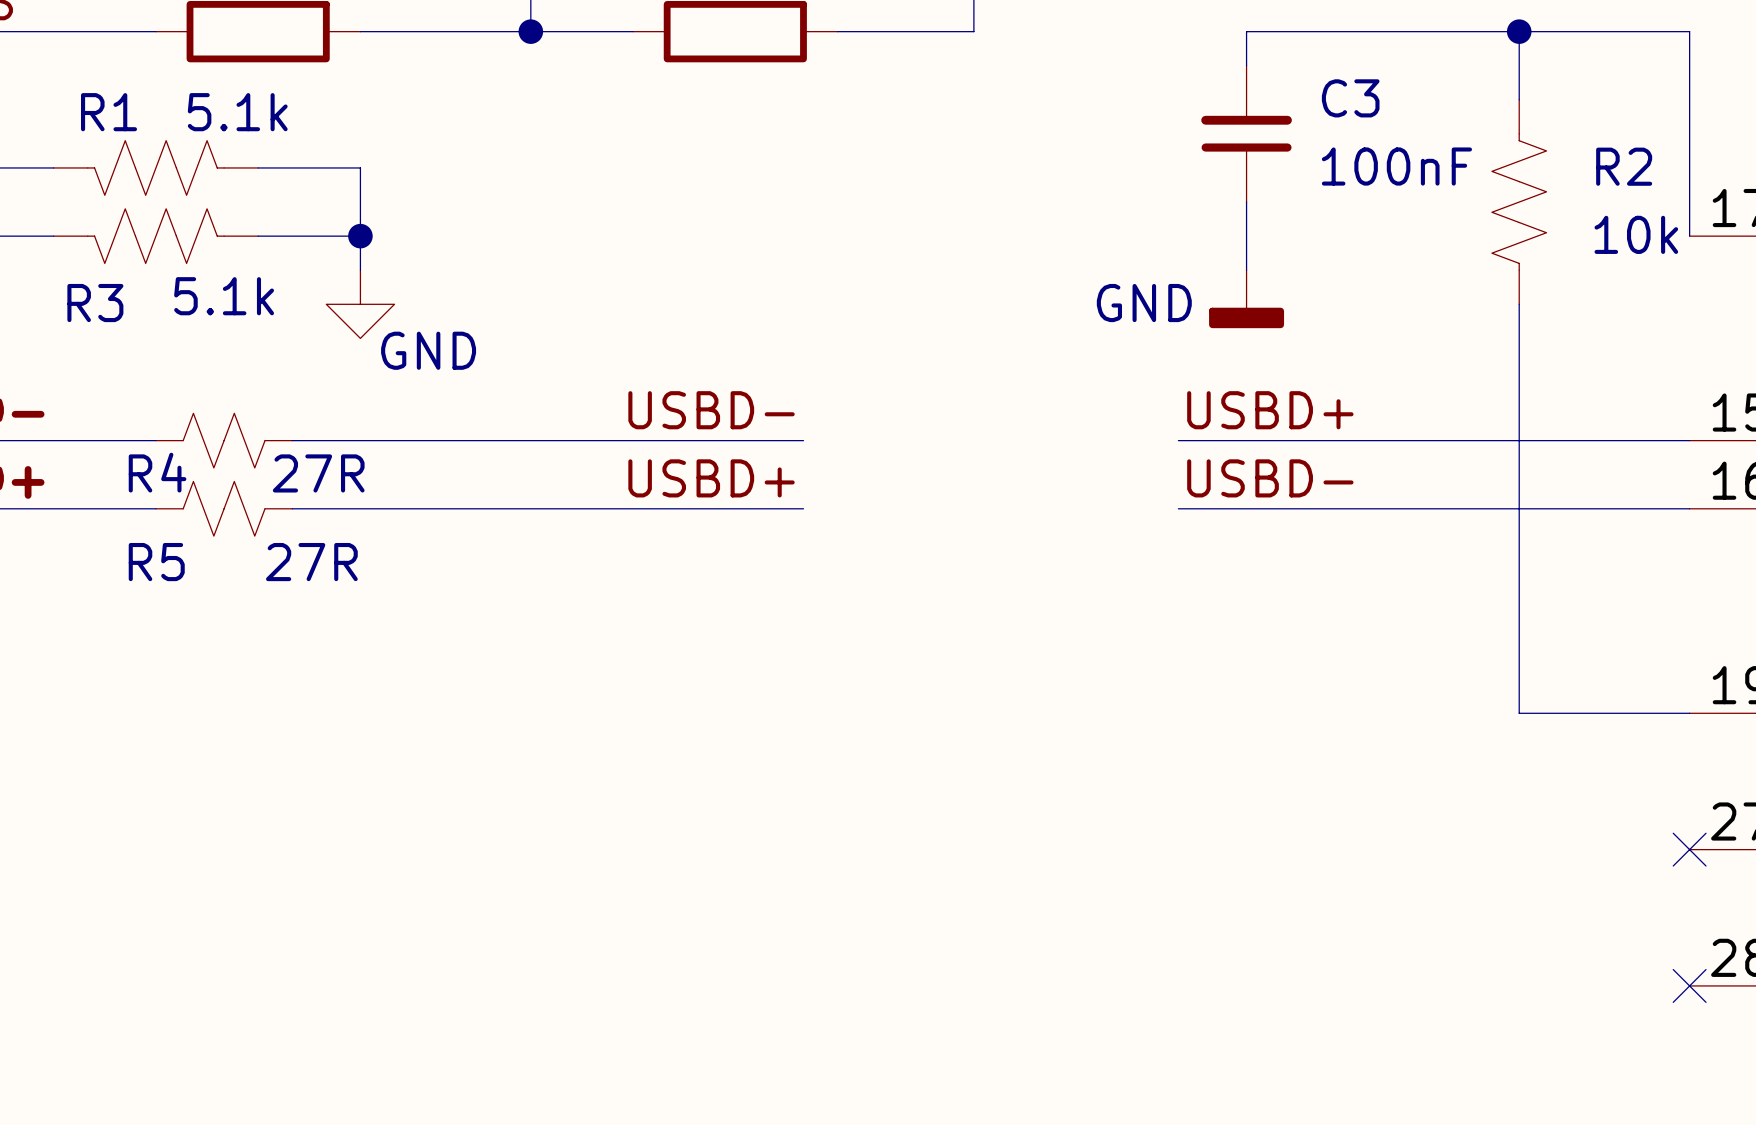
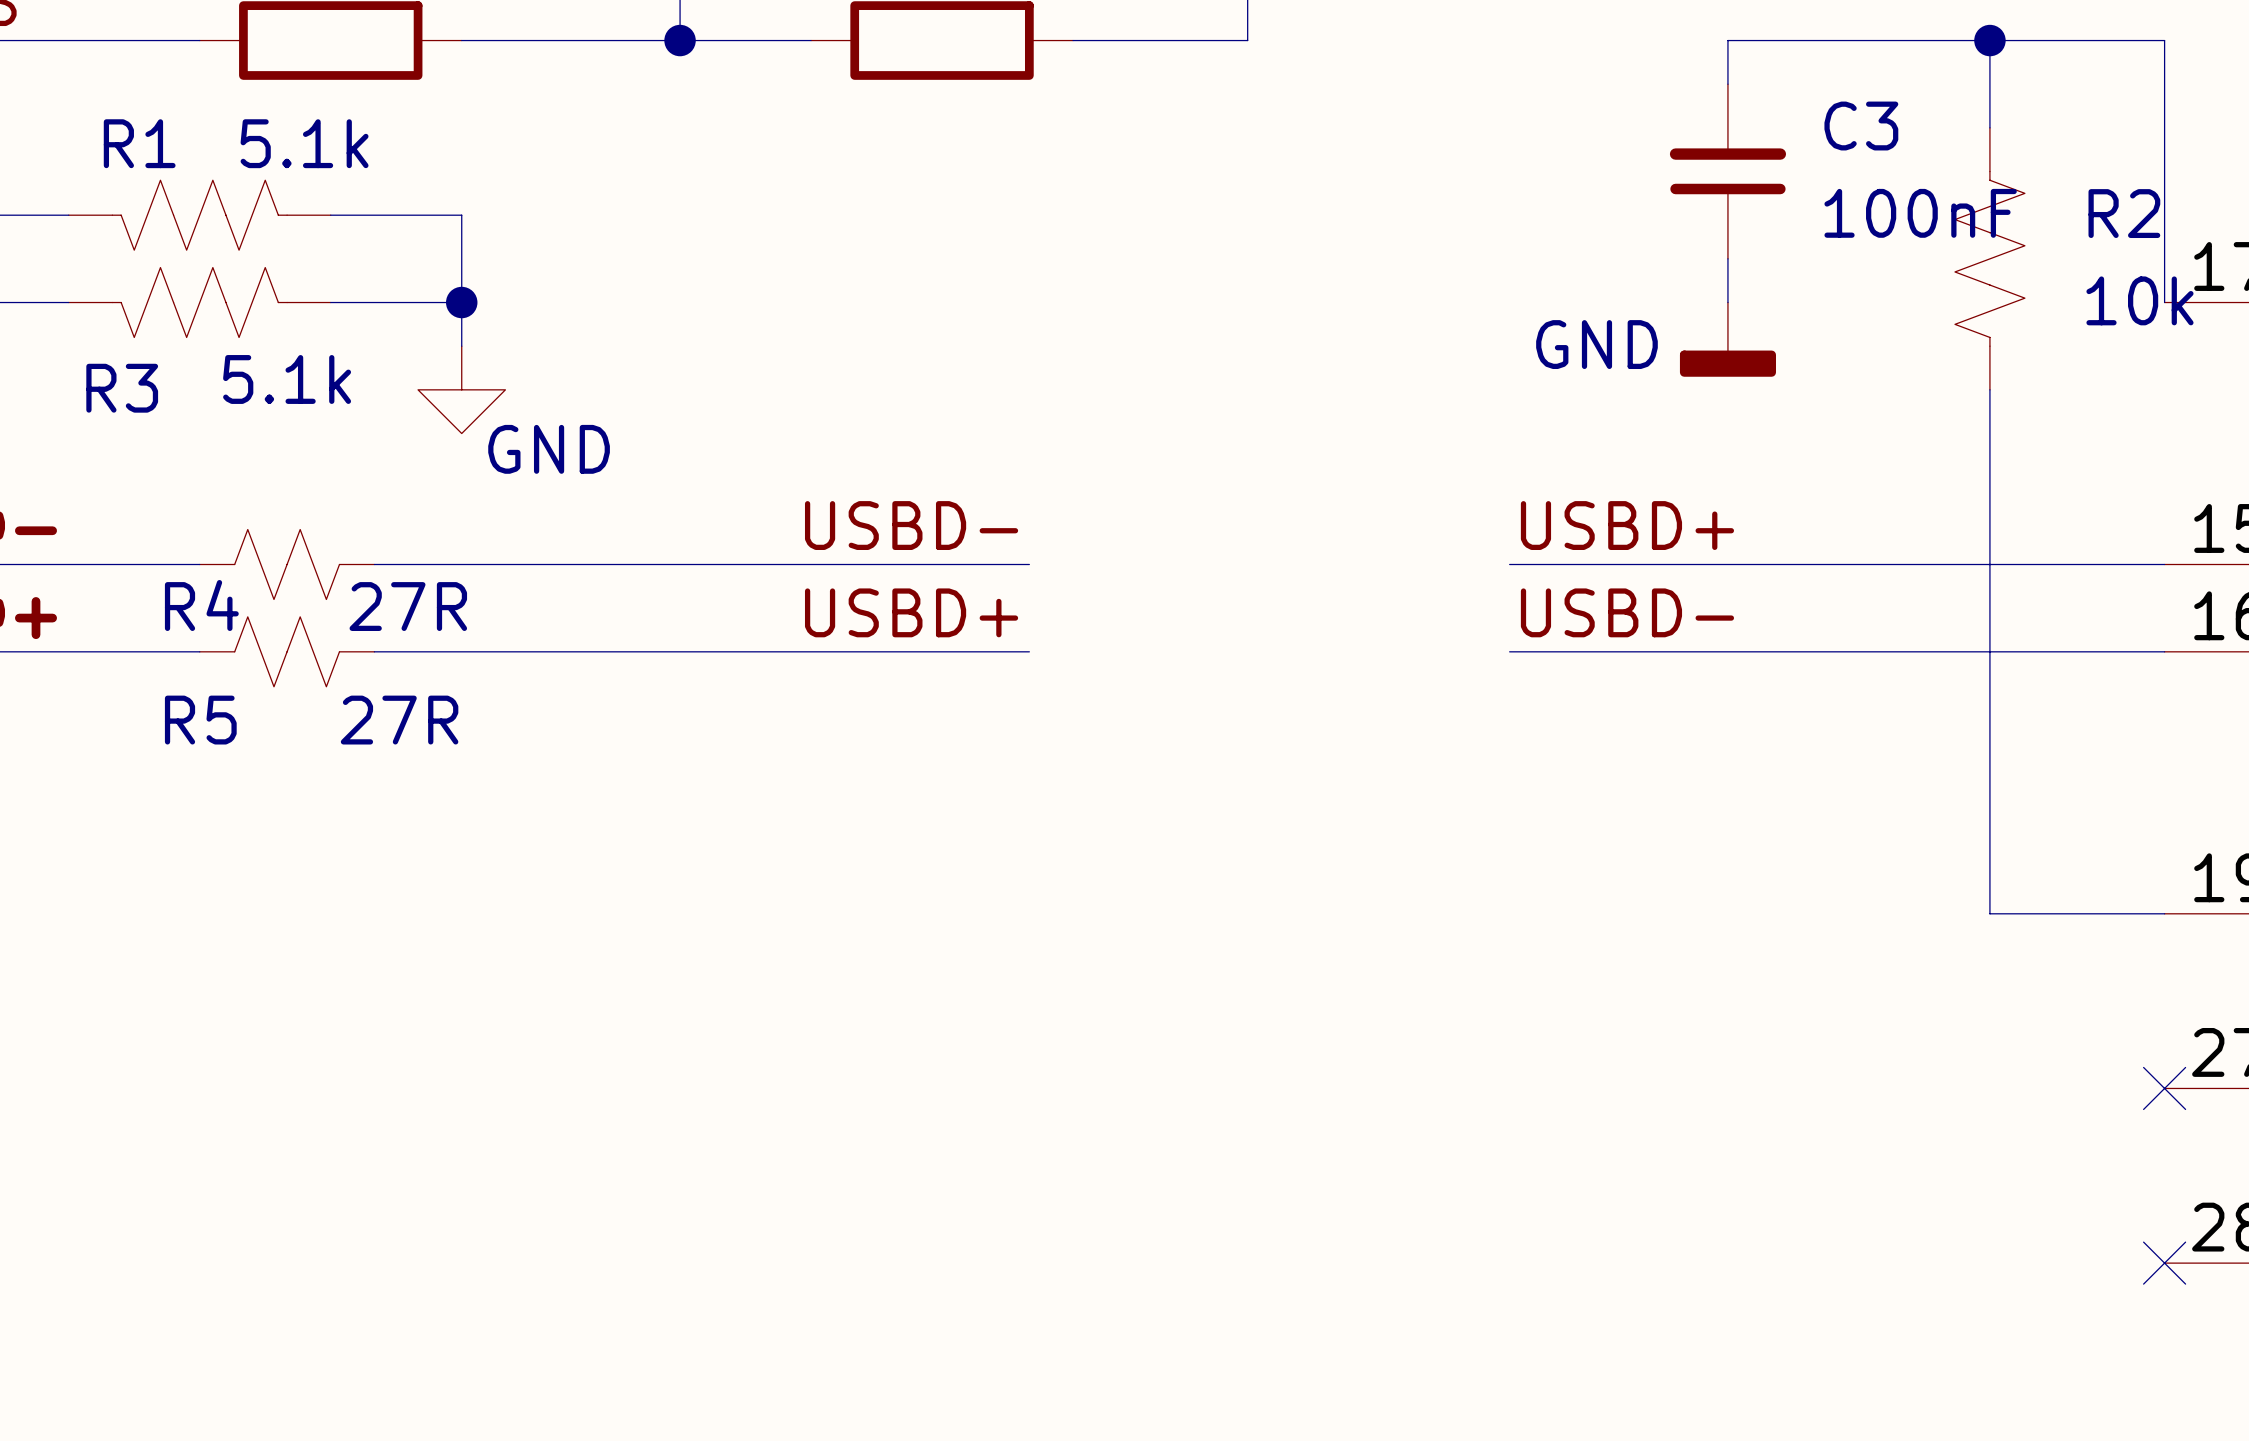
wire: (1348, 31) (1246, 31) (1246, 65) -> (1727, 40) (1727, 84)
wire: (1519, 31) (1519, 99) -> (1989, 40) (1989, 127)
junction position: (1519, 31) -> (1989, 40)
C3 position: (1246, 133) -> (1727, 171)
wire: (1246, 202) (1246, 270) -> none
wire: none -> (1727, 258) (1727, 302)
R2 position: (1519, 202) -> (1989, 258)
power symbol position: GND (1246, 299) -> GND (1727, 339)
wire: (1519, 304) (1519, 713) (1553, 713) -> (1989, 389) (1989, 913)

